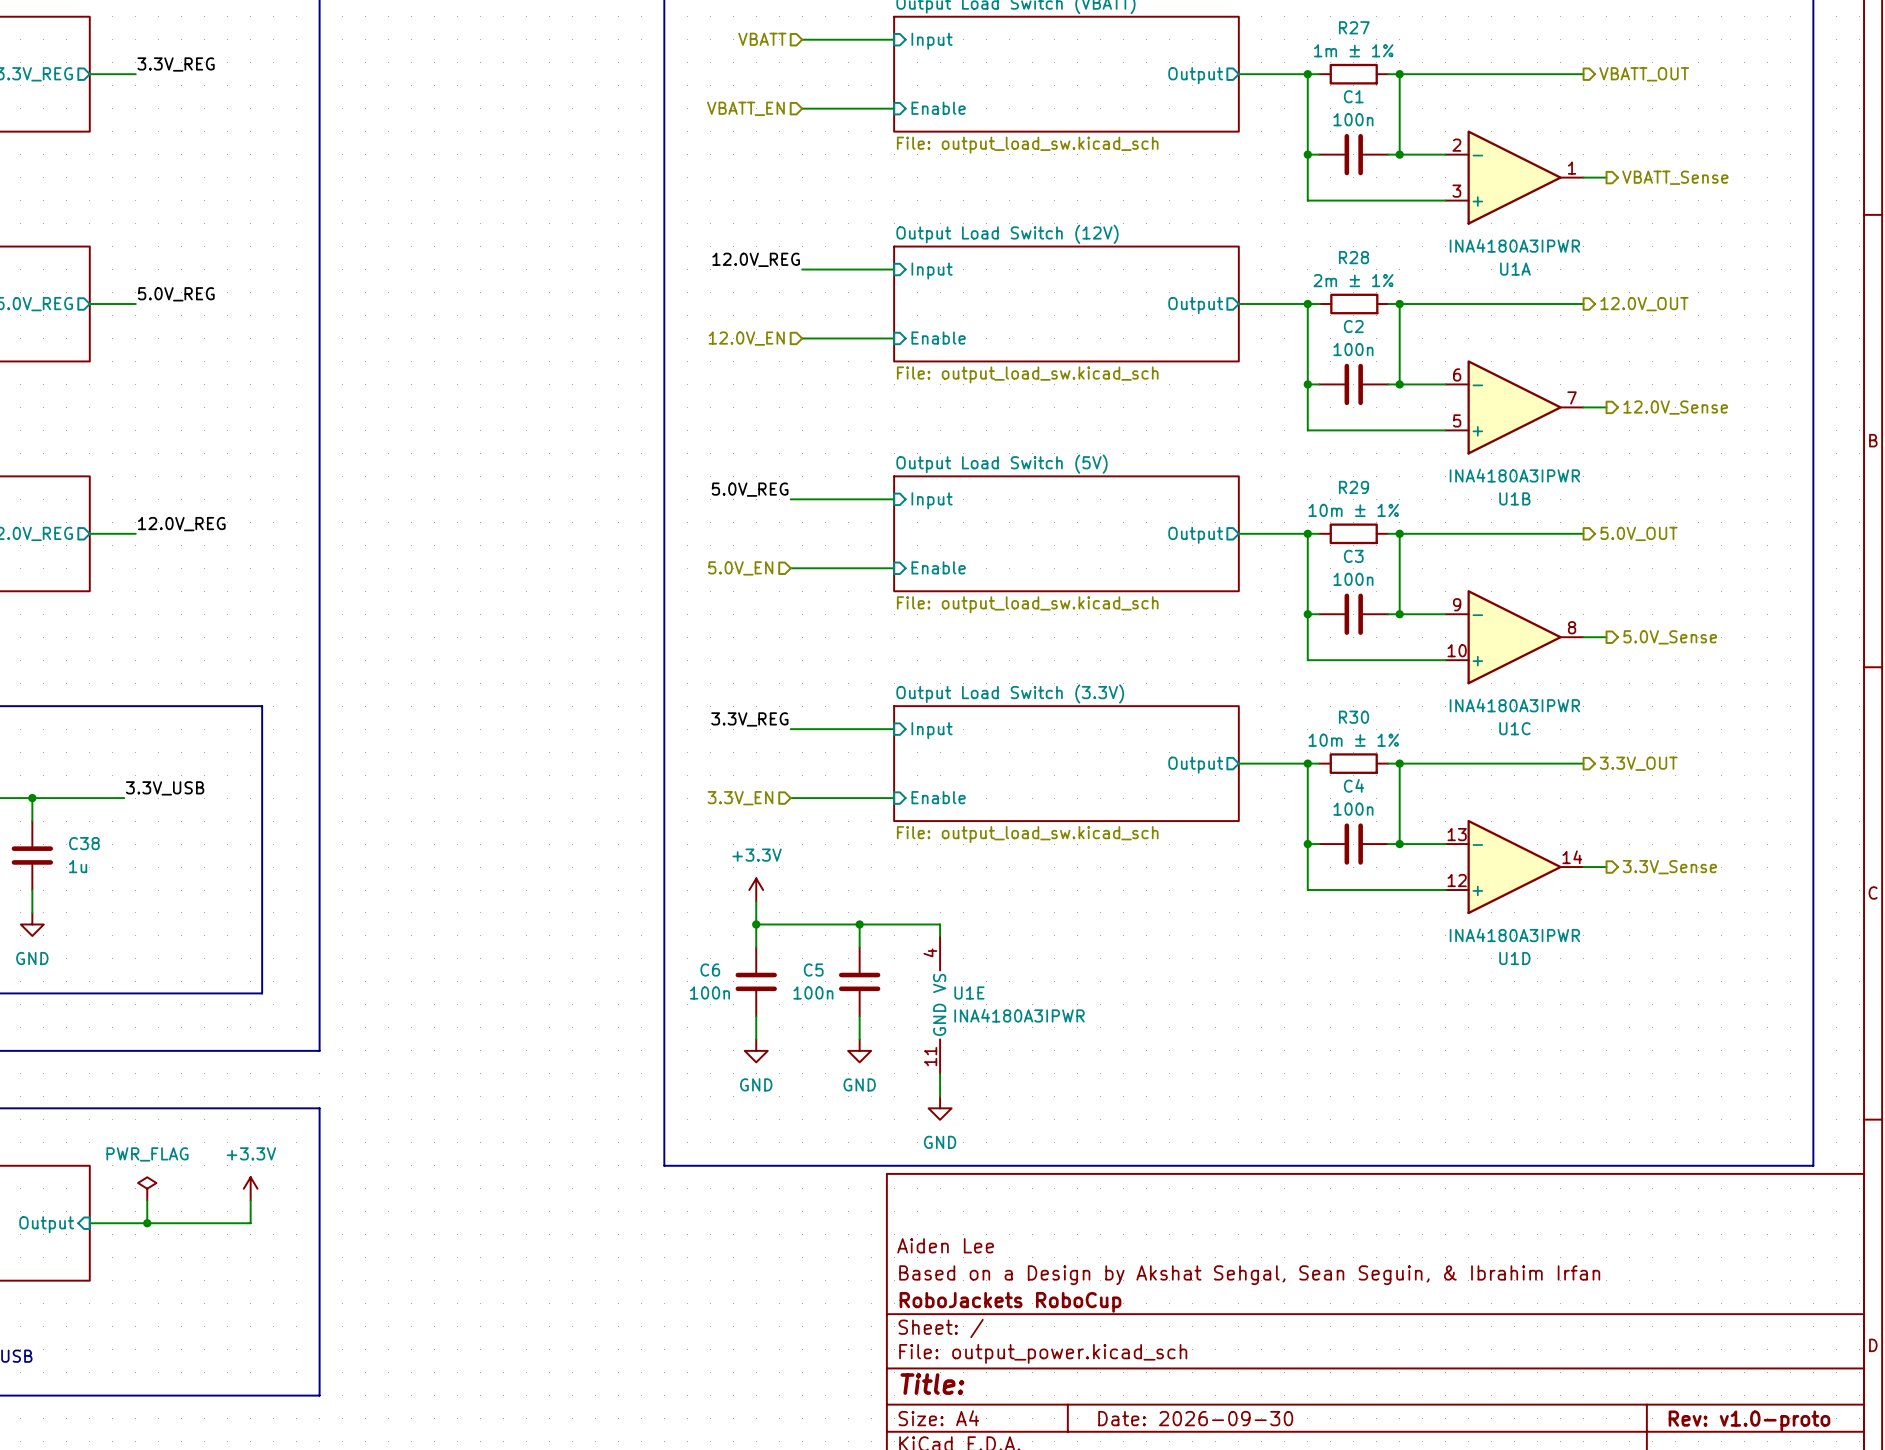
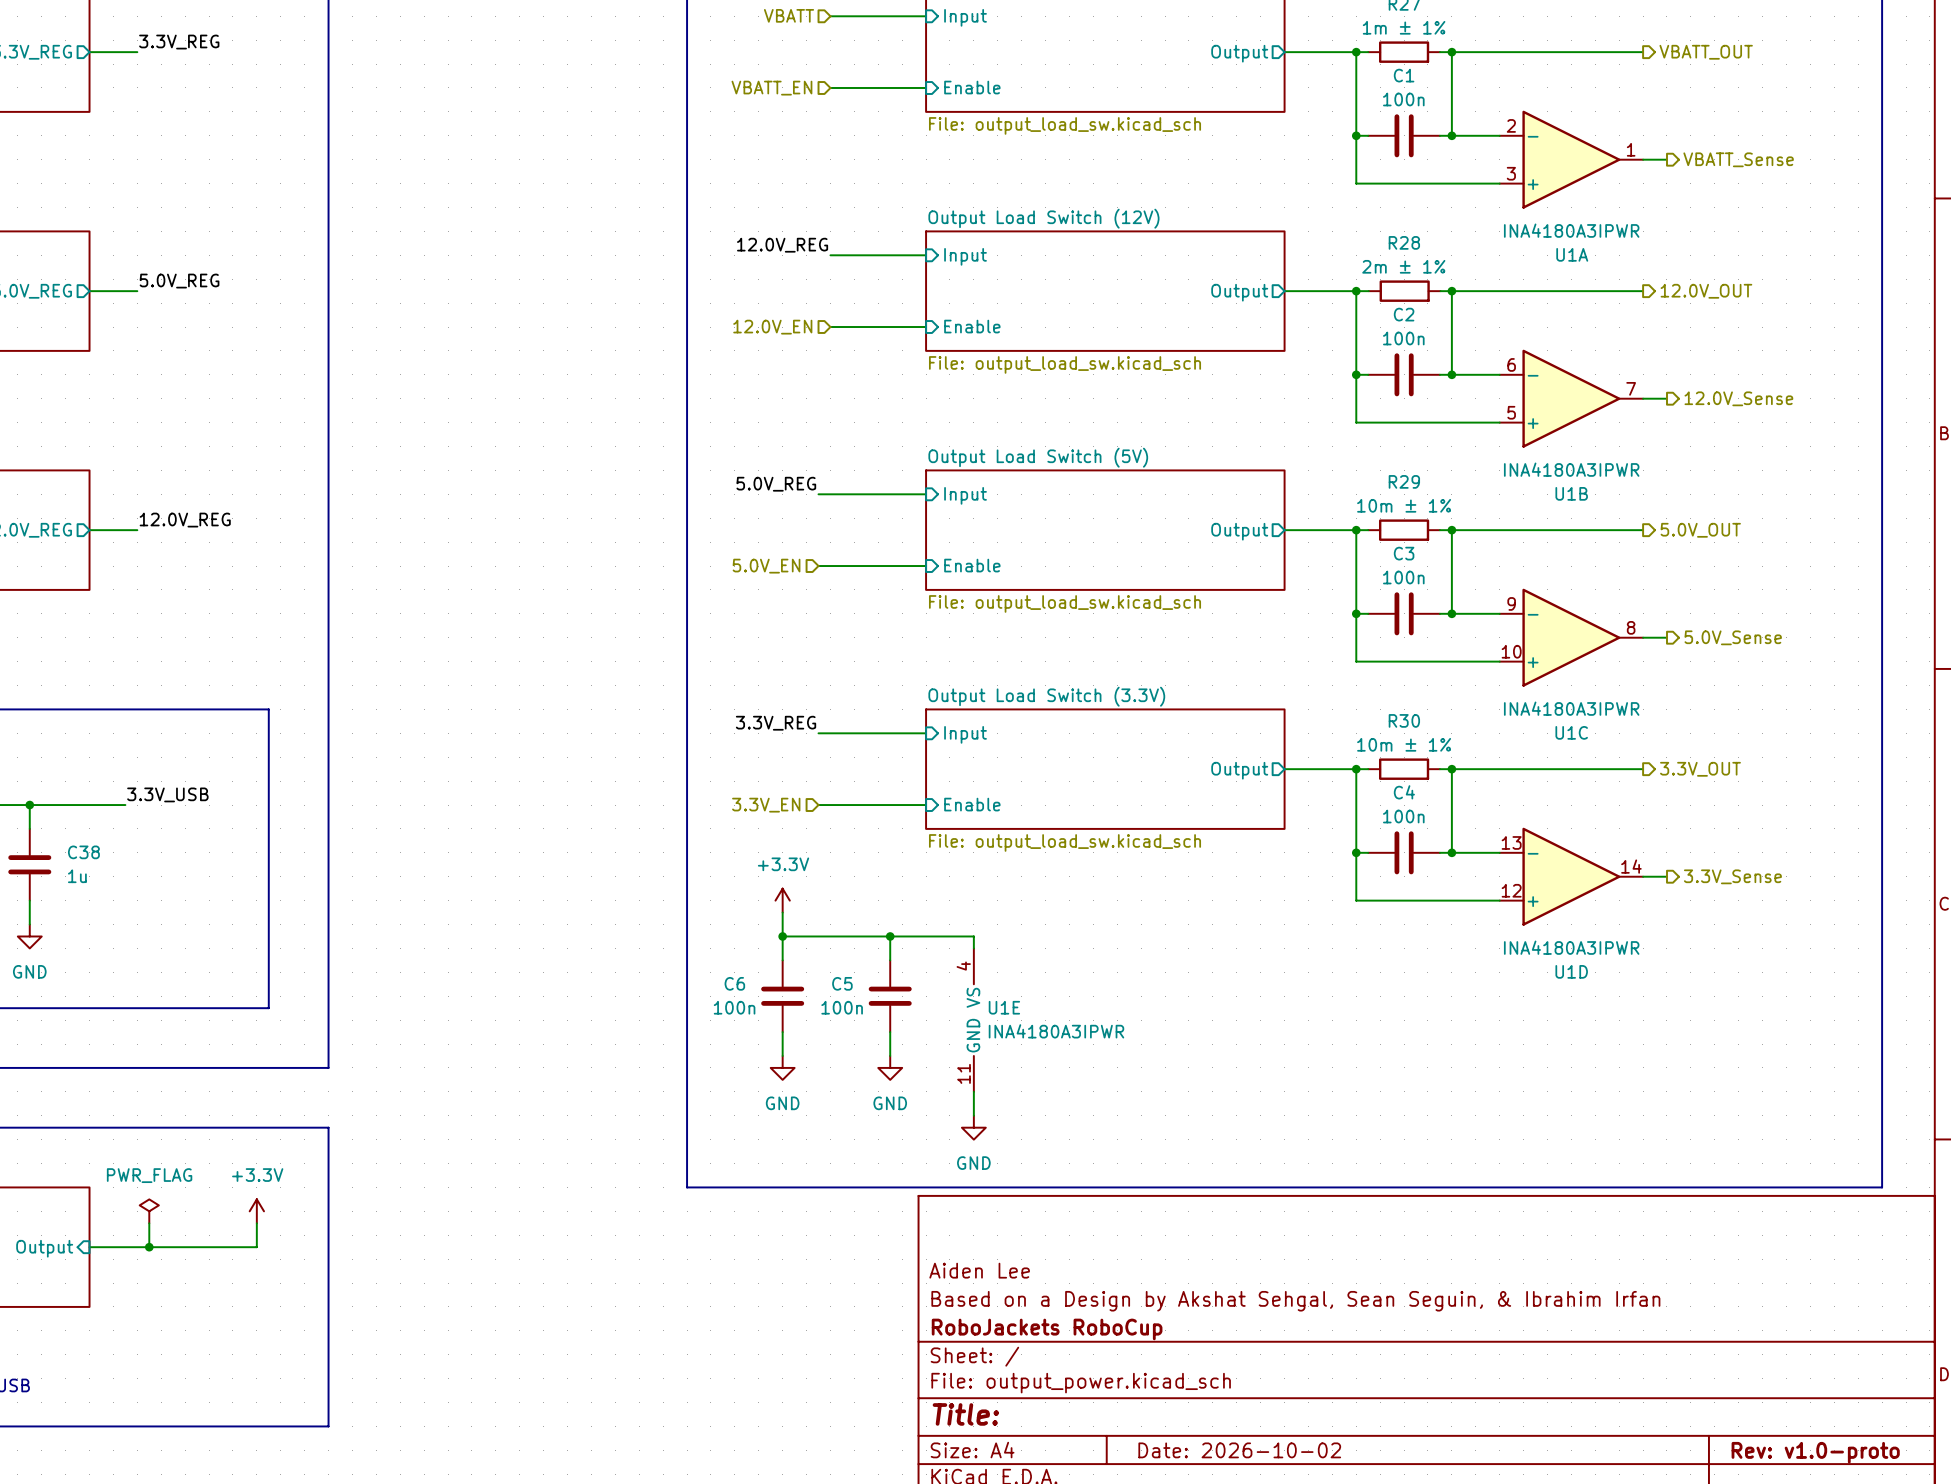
title block: Date: 2026-09-30 (1195, 1418) -> Date: 2026-10-02 (1239, 1450)

